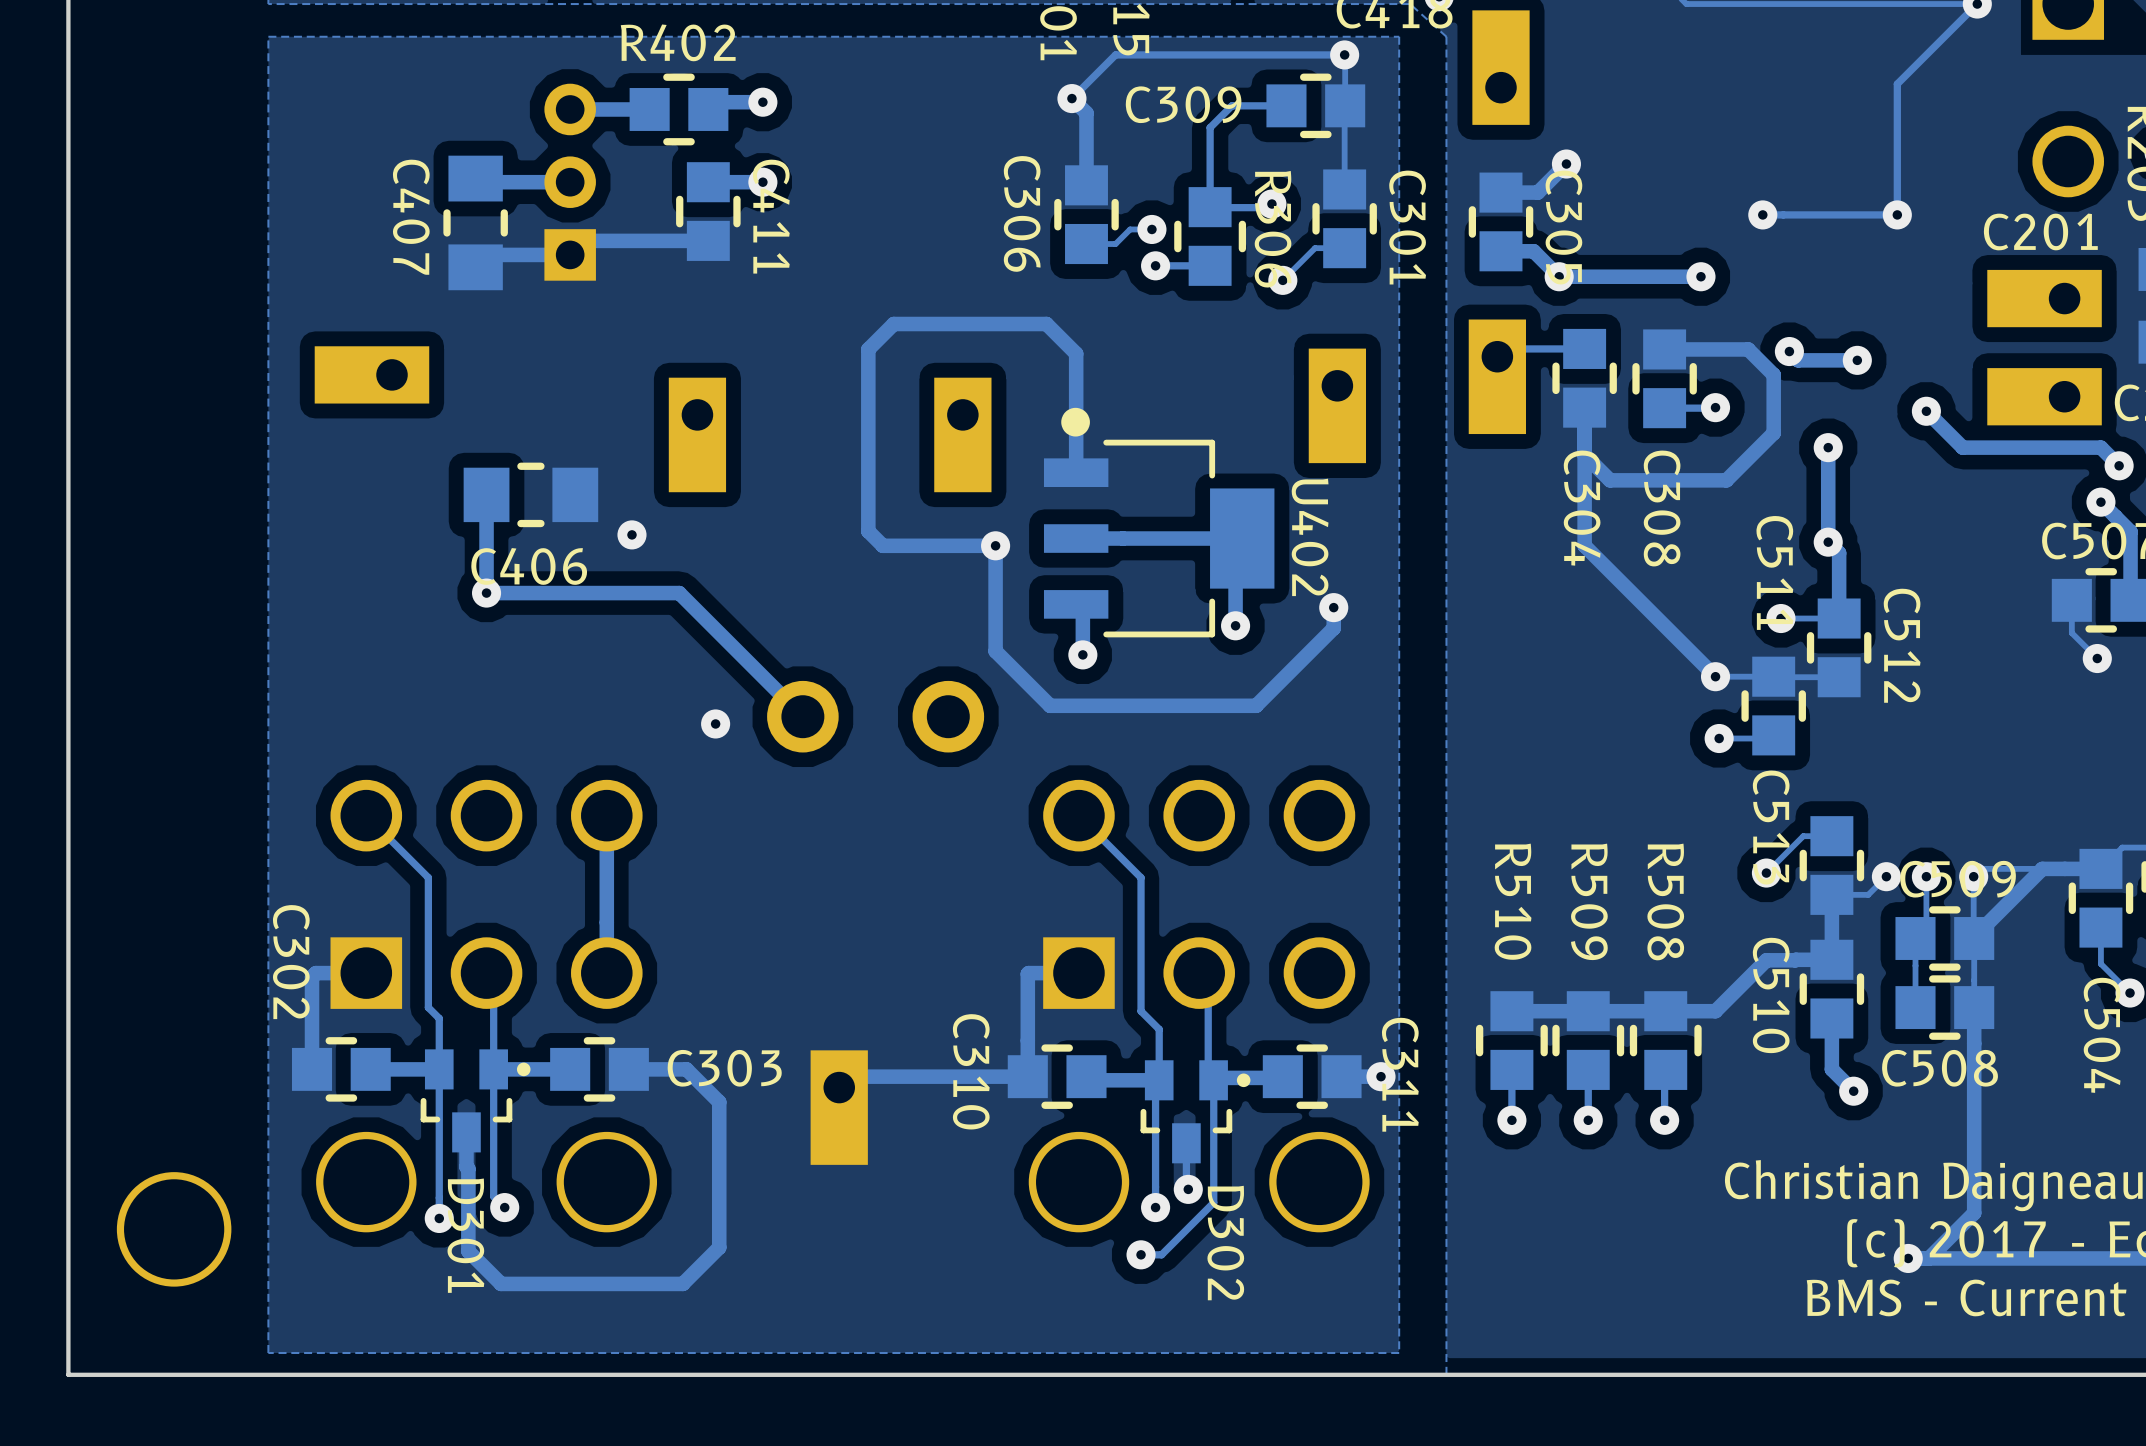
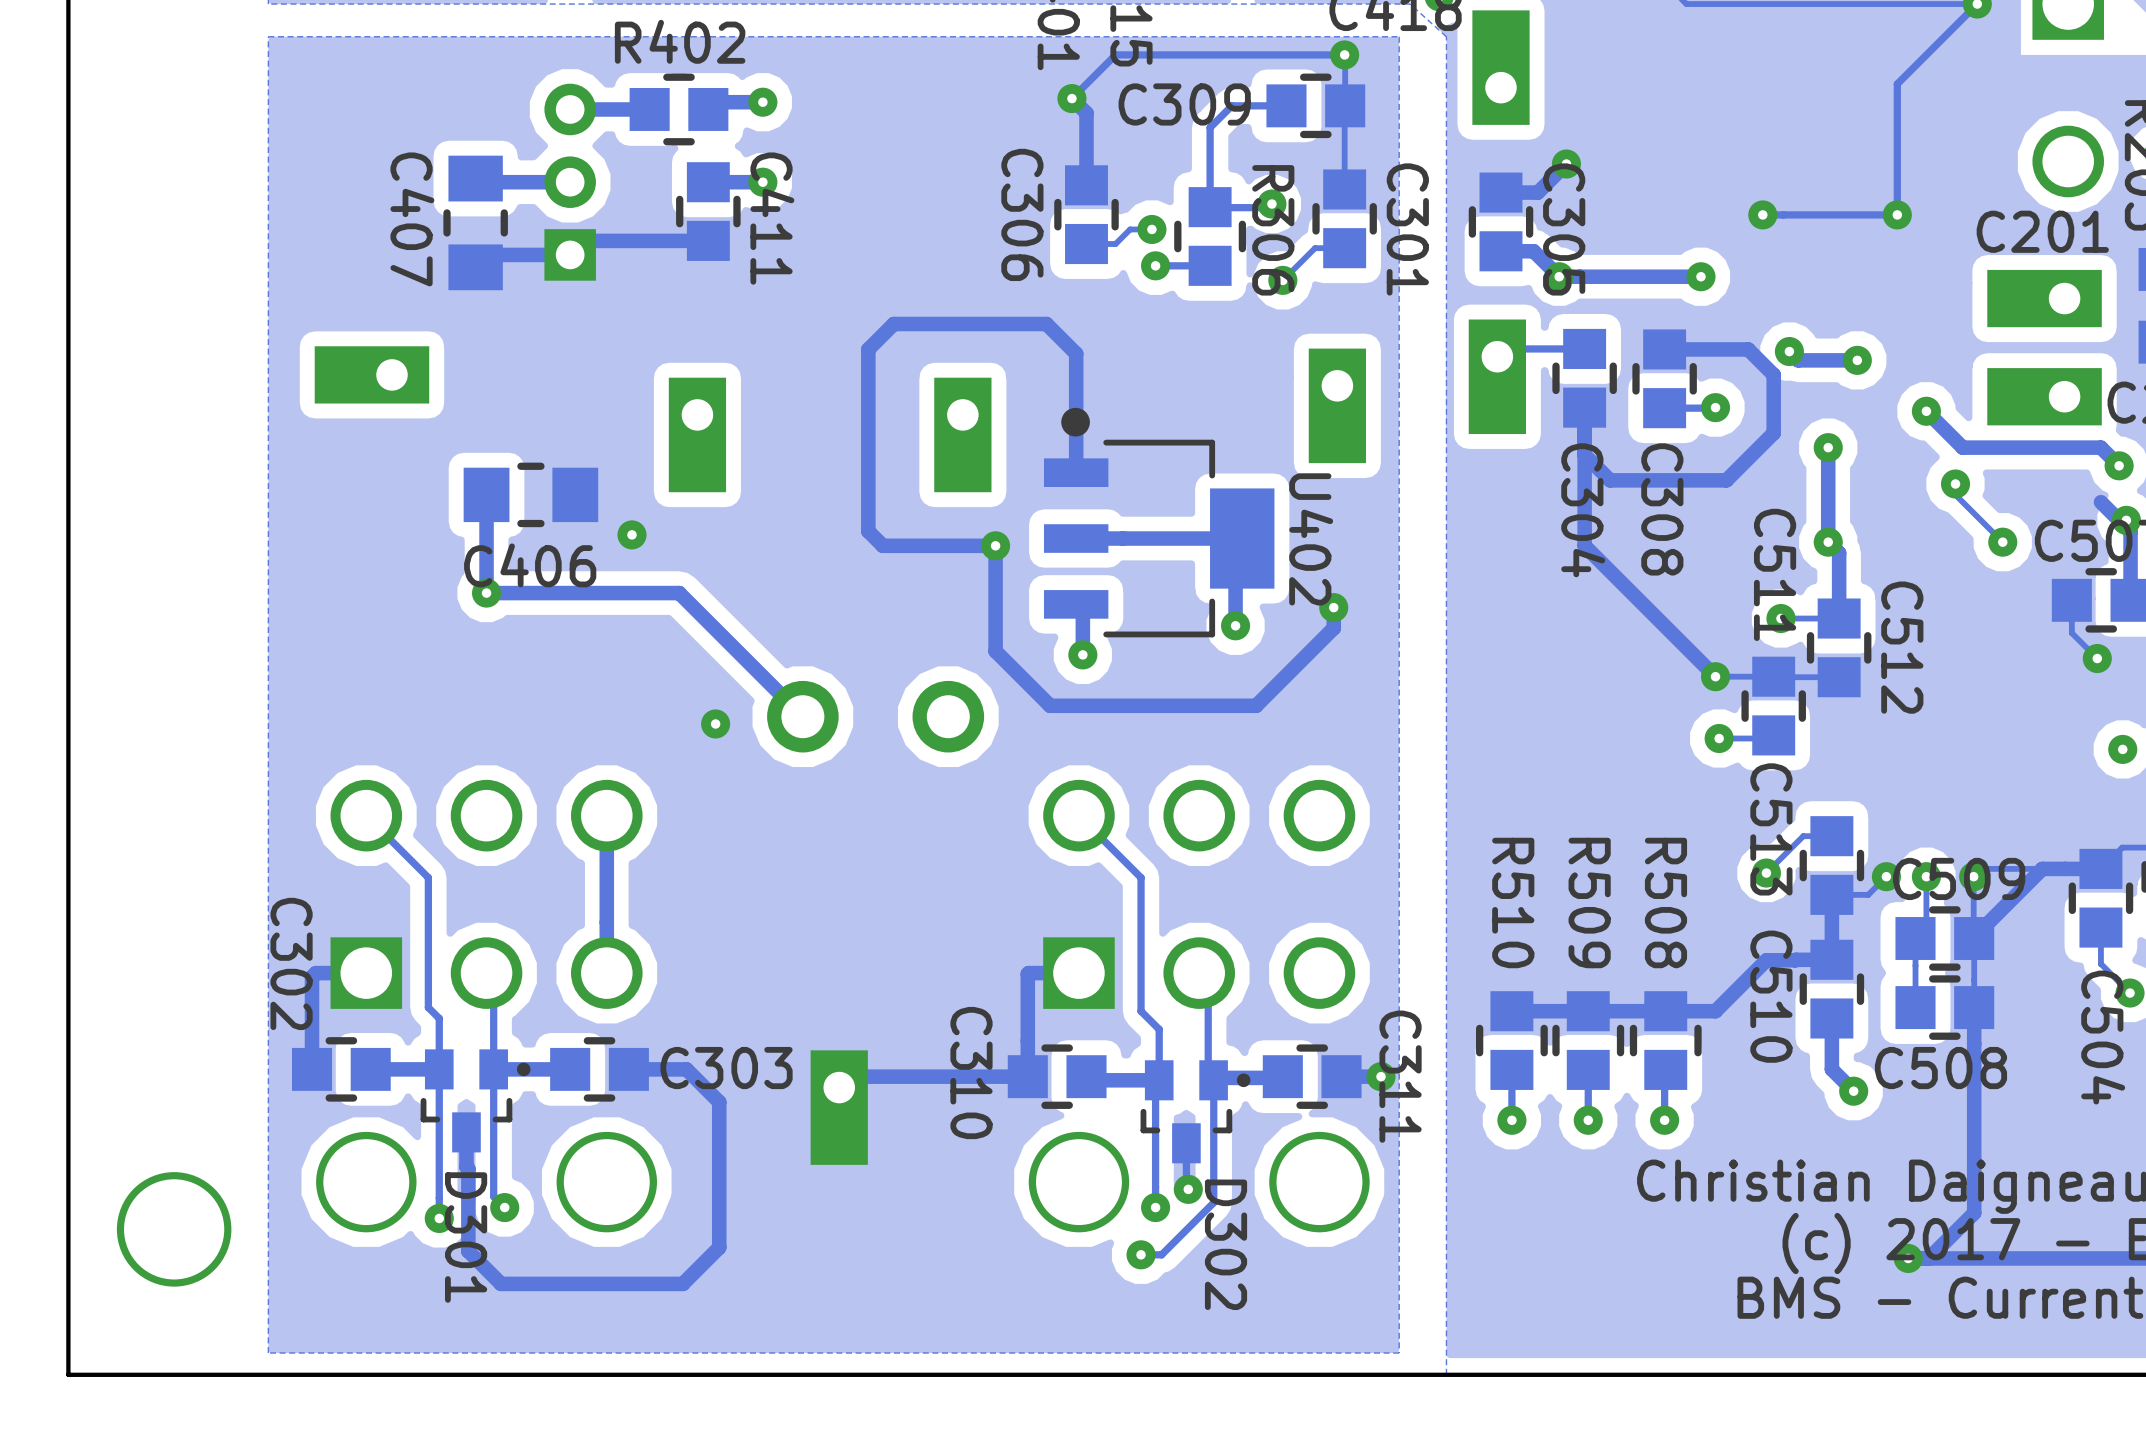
track: none -> (1955, 483) (1955, 494) (2002, 542)
via: none -> (1955, 483)
via position: (2100, 502) -> (2126, 520)
via: none -> (2002, 542)
via: none -> (2122, 749)

